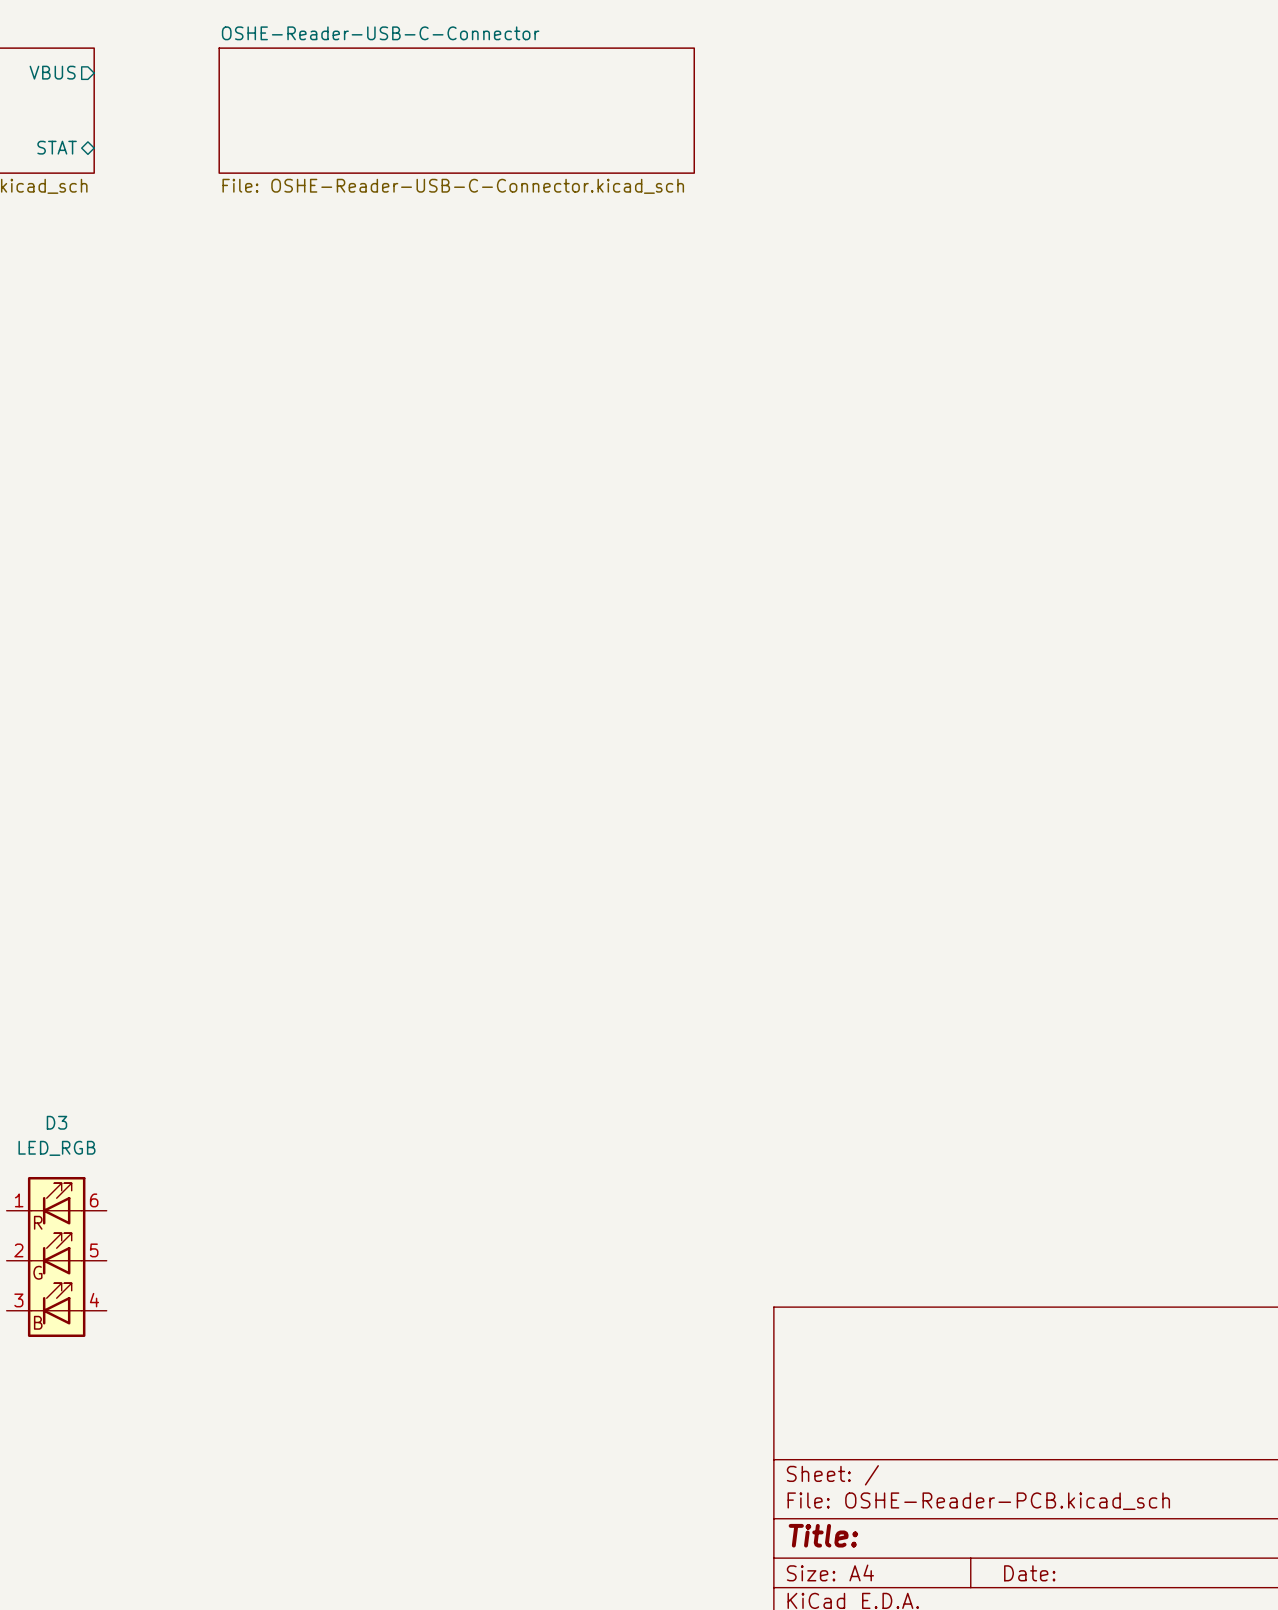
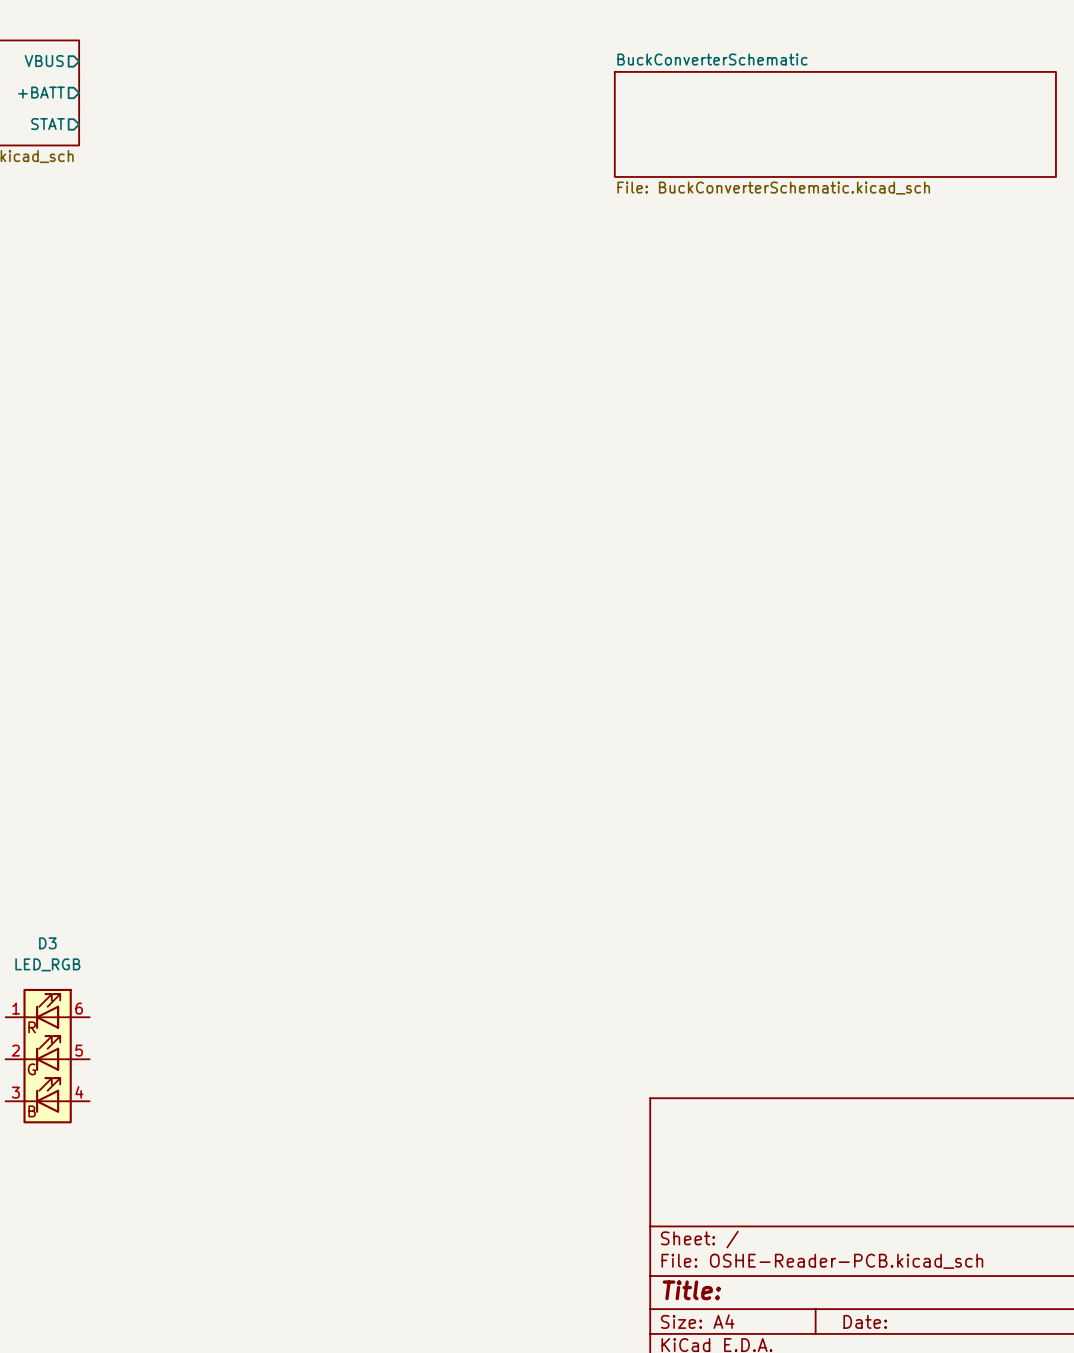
sheet pin: none -> +BATT (41, 92)
sheet OSHE-Reader-USB-C-Connector: File: OSHE-Reader-USB-C-Connector.kicad_sch (456, 110) -> none
sheet pin shape: bidirectional (57, 147) -> output (47, 124)
sheet BuckConverterSchematic: none -> File: BuckConverterSchematic.kicad_sch (835, 124)

